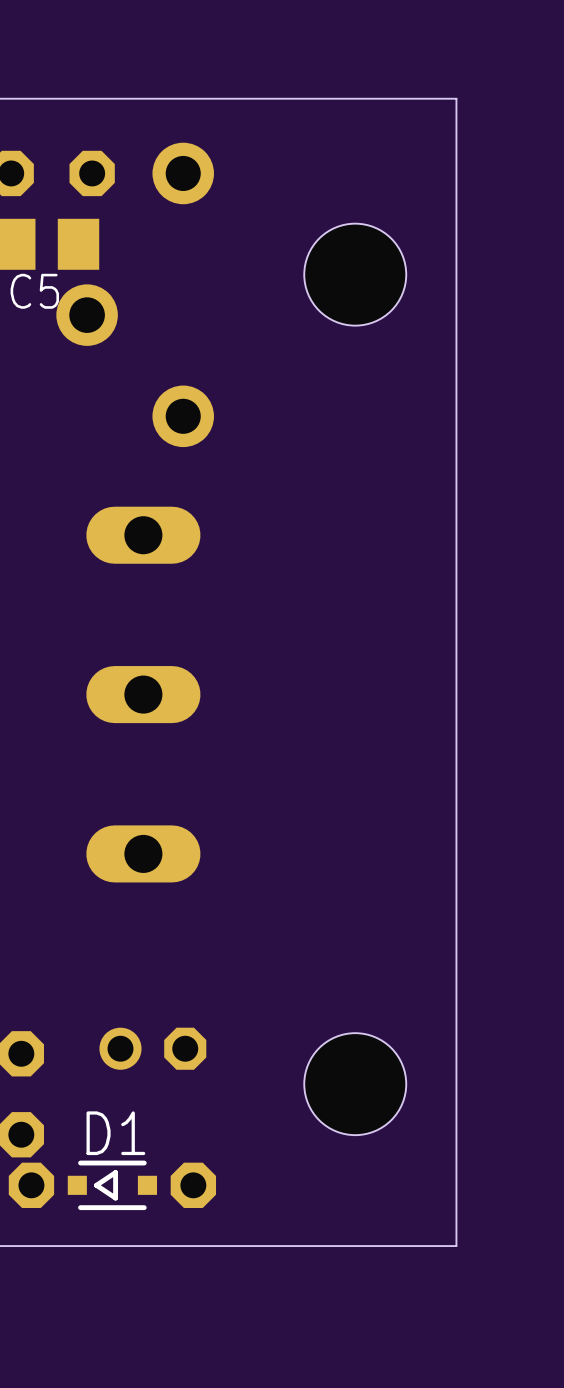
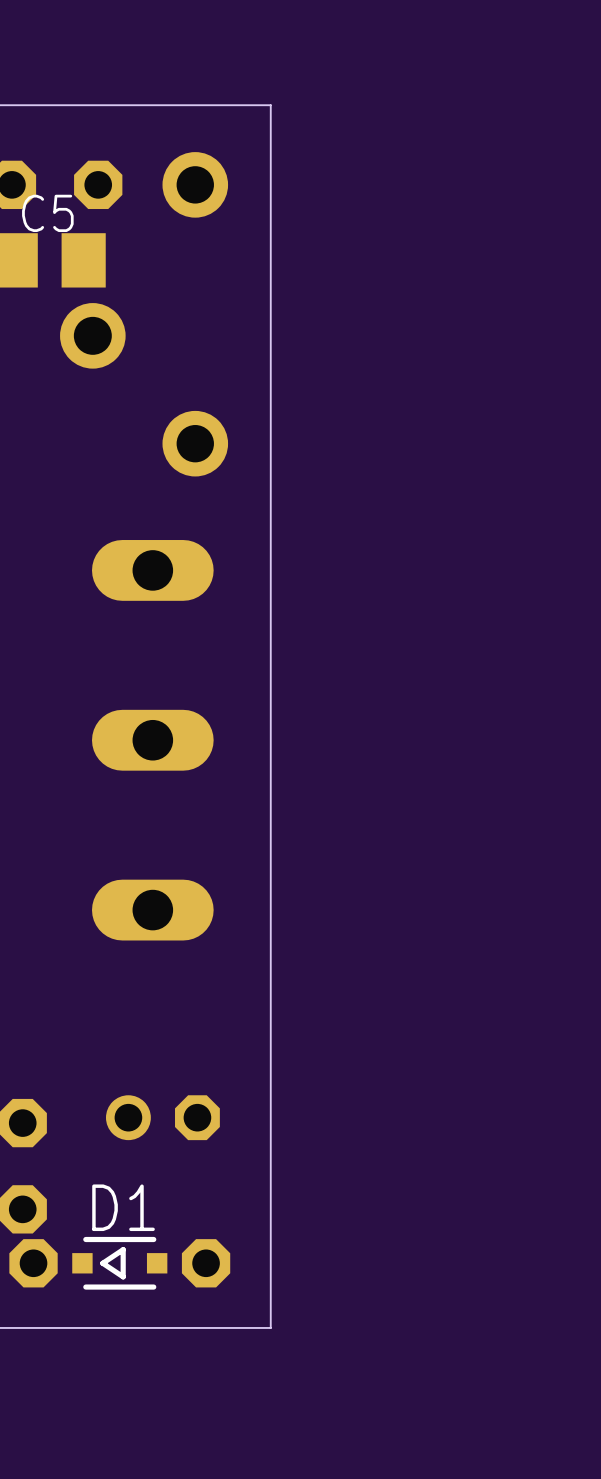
board edge: (254, 98) (456, 98) (456, 1246) (254, 1246) -> (270, 105) (270, 1327)
hole: (355, 274) -> none
C5 name position: C5 (34, 291) -> C5 (47, 213)
hole: (355, 1084) -> none

